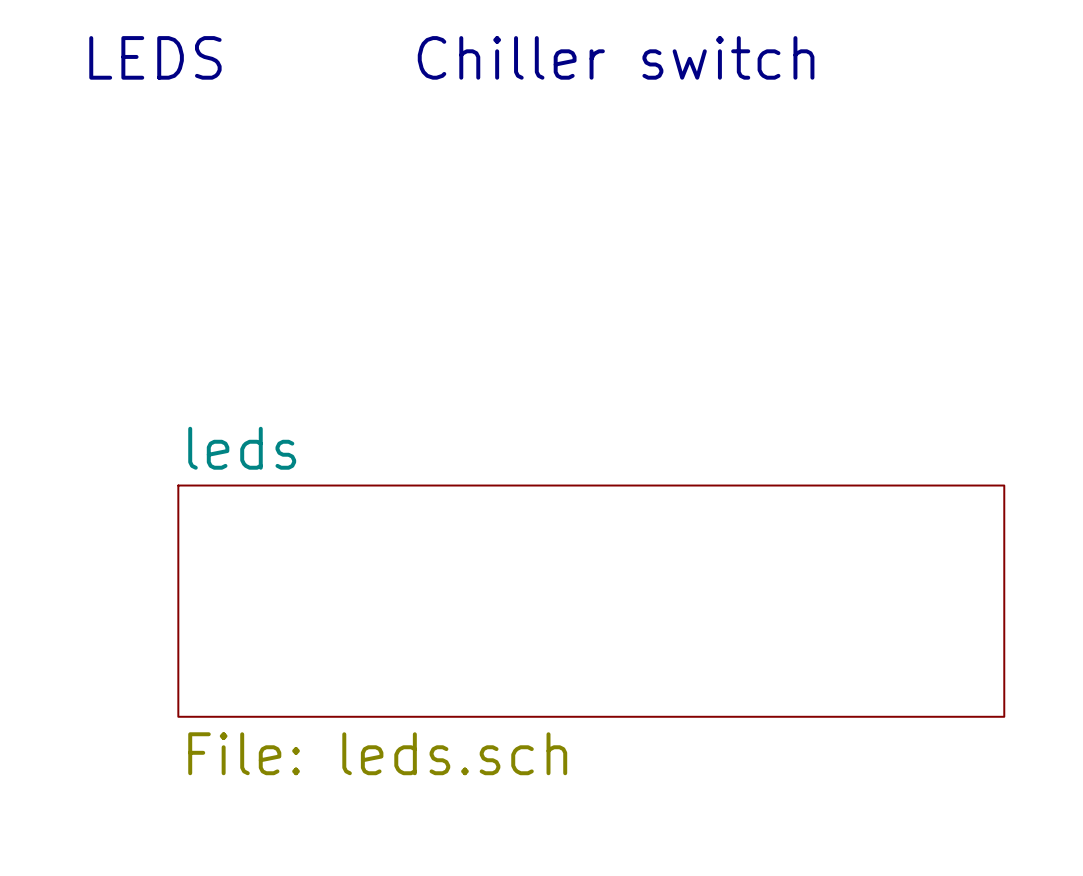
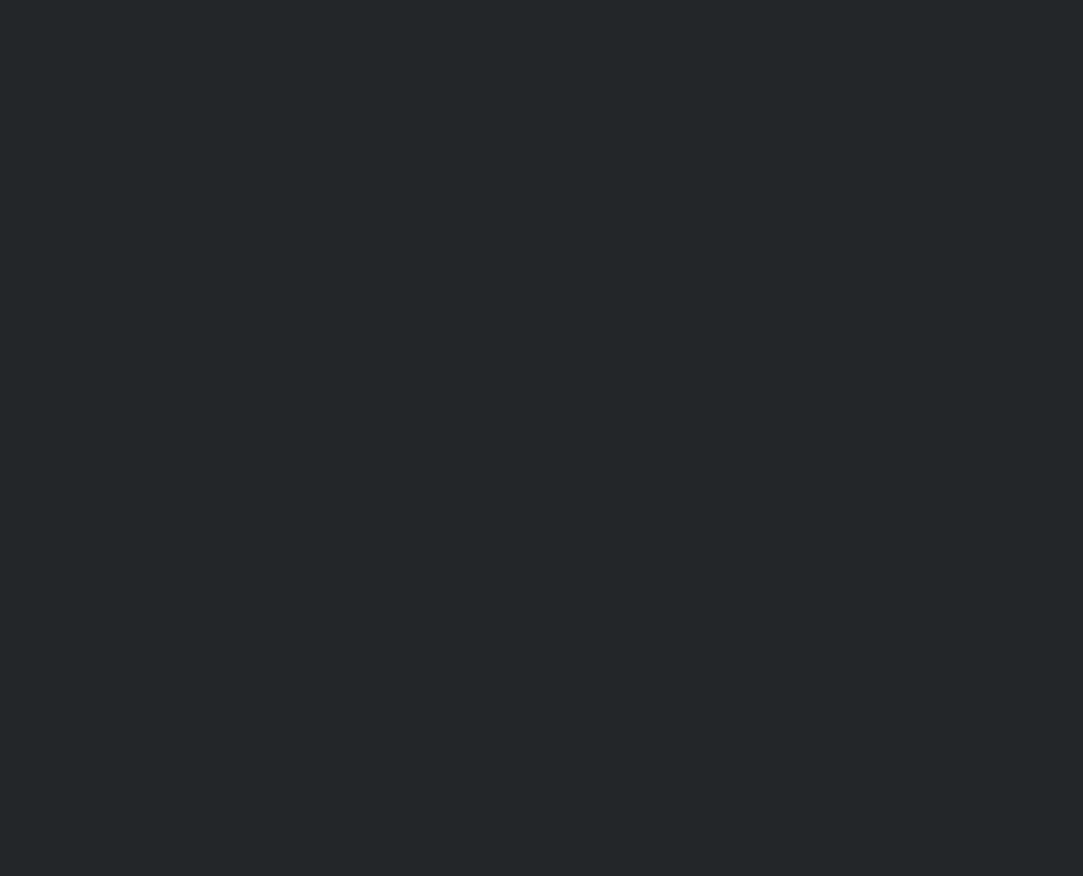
text: LEDS (155, 57) -> none
text: Chiller switch (616, 57) -> none
sheet leds: File: leds.sch (591, 601) -> none

